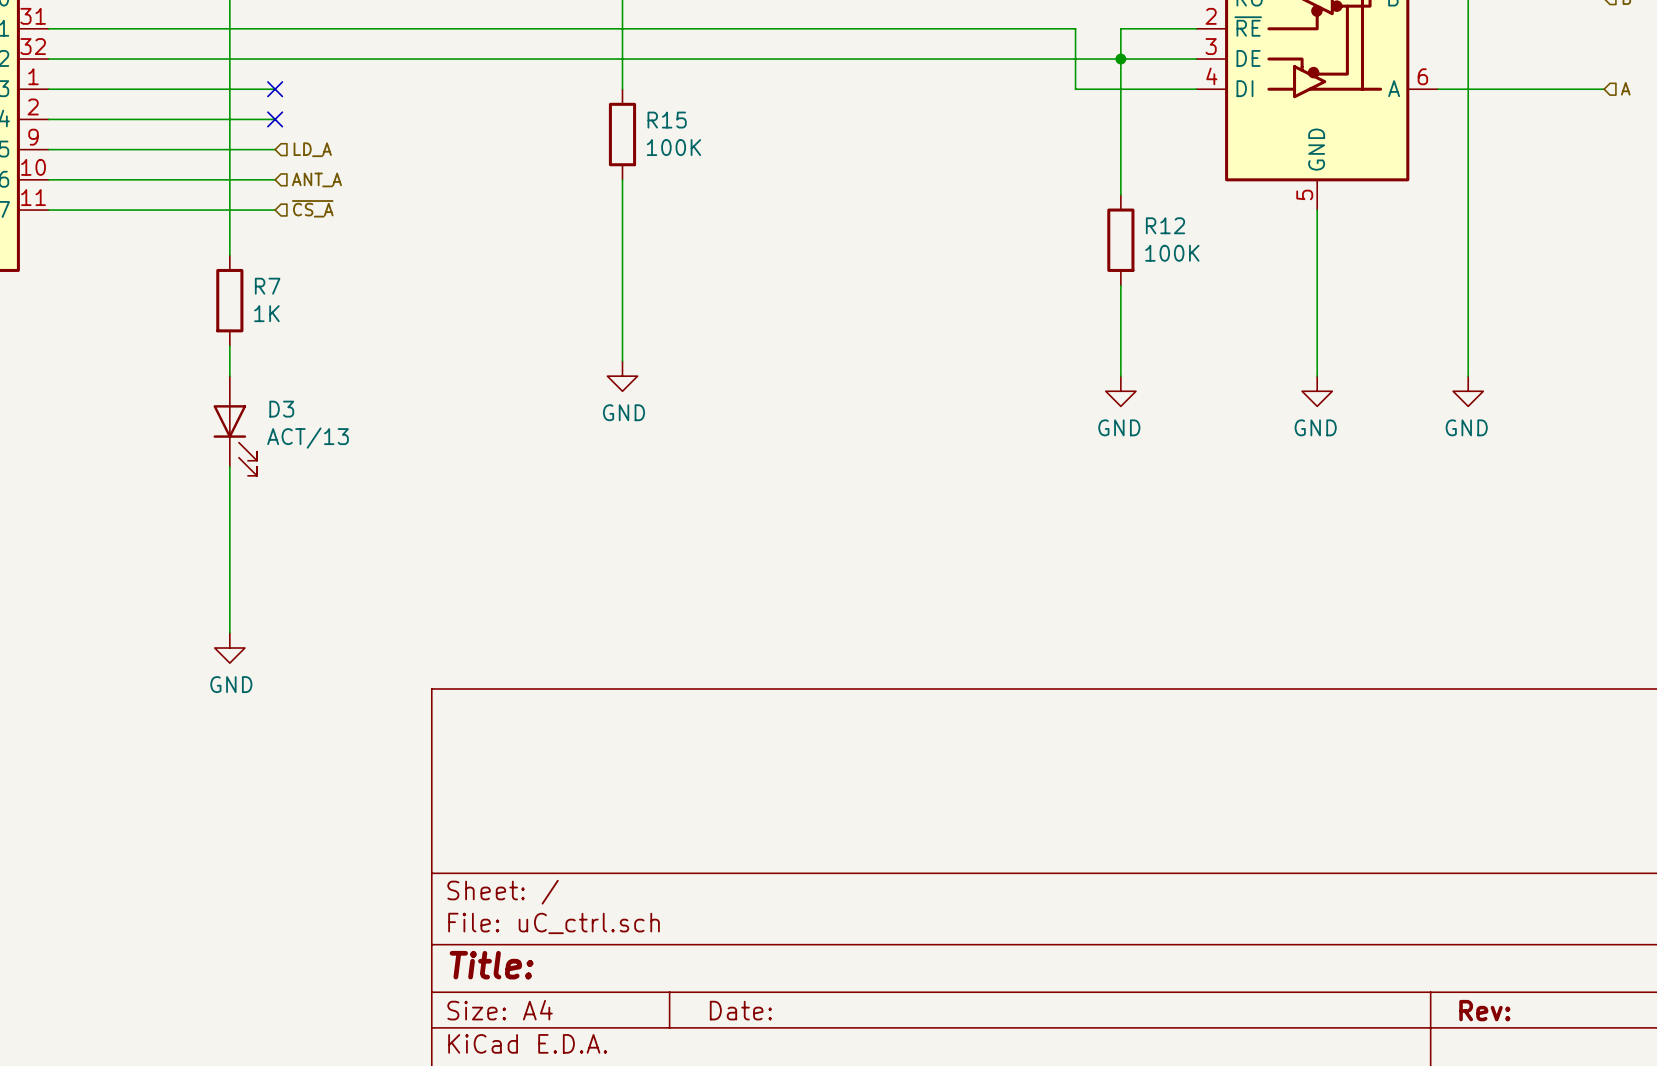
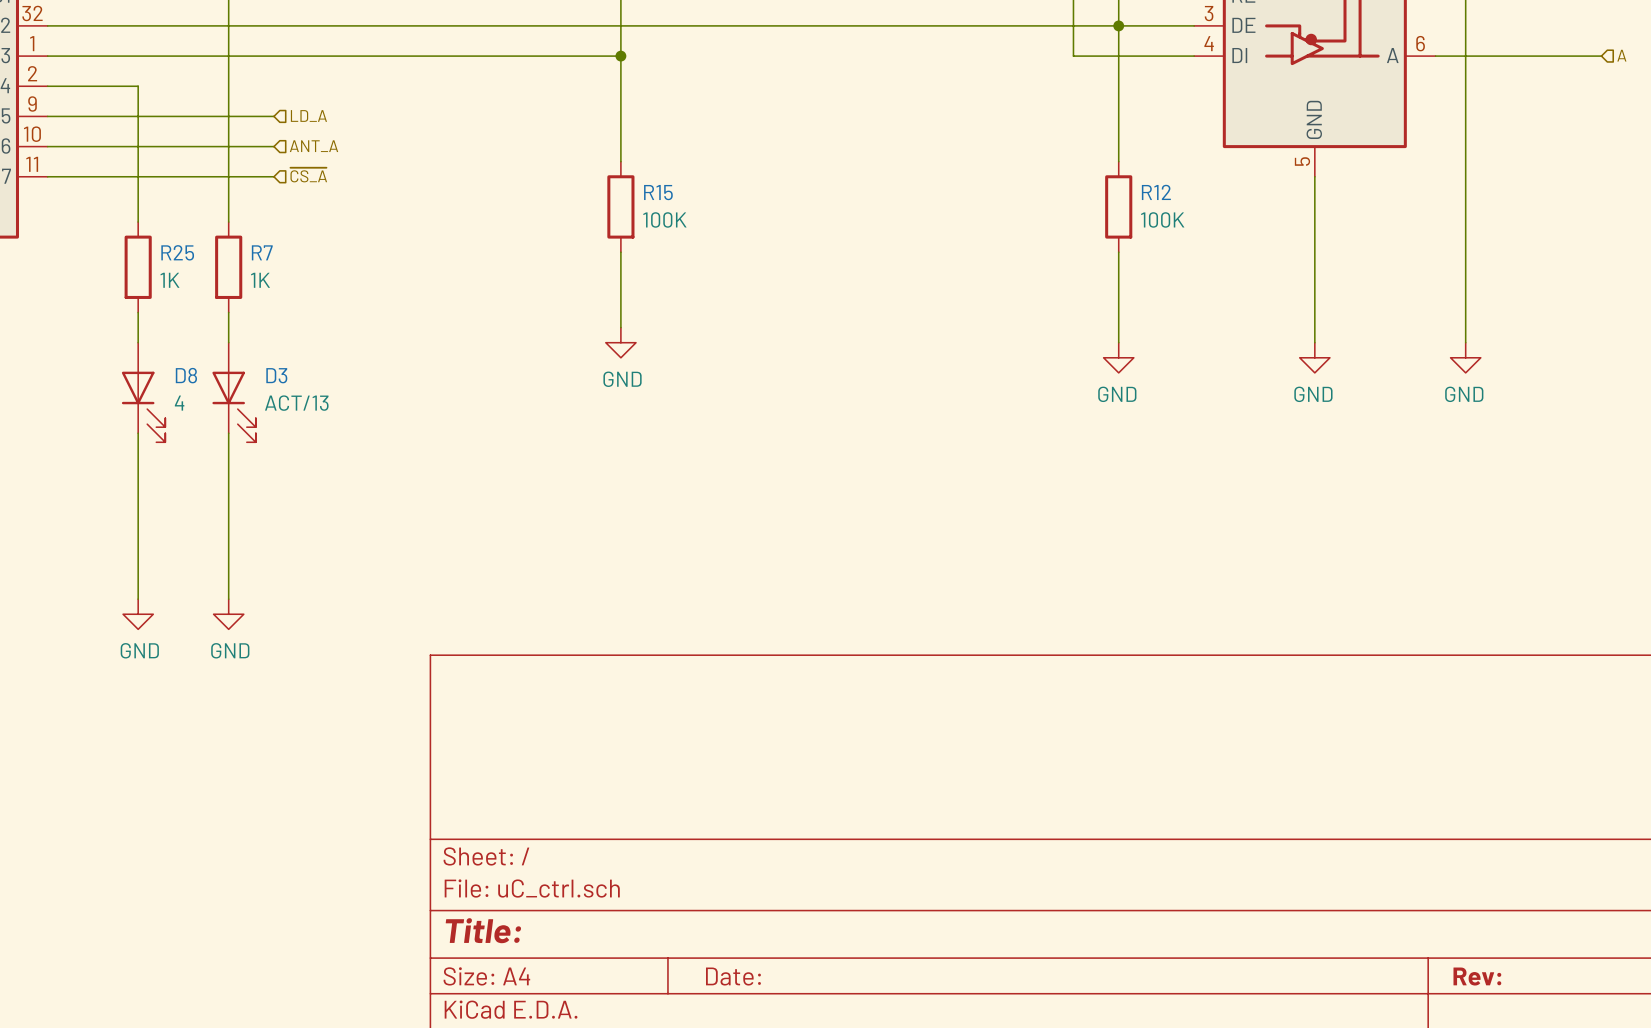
wire: none -> (273, 56) (620, 56) (620, 146)
no-connect mark: (275, 89) -> none
junction: none -> (620, 56)
wire: (139, 119) (275, 119) -> (138, 86) (138, 222)
no-connect mark: (275, 119) -> none
R15 position: (622, 134) -> (620, 206)
wire: (622, 194) (622, 285) -> none
R25: none -> 1K (138, 267)
wire: none -> (138, 312) (138, 342)
D8: none -> 4 (143, 392)
wire: none -> (138, 433) (138, 599)
power symbol: none -> GND (138, 614)

